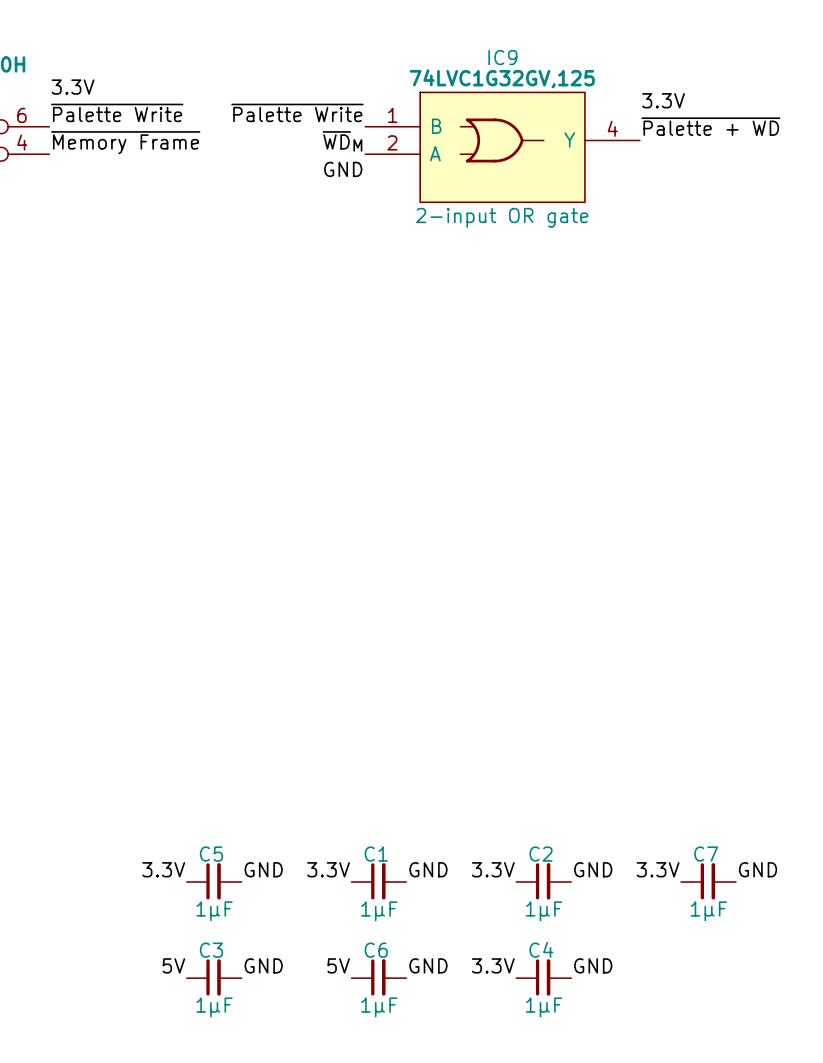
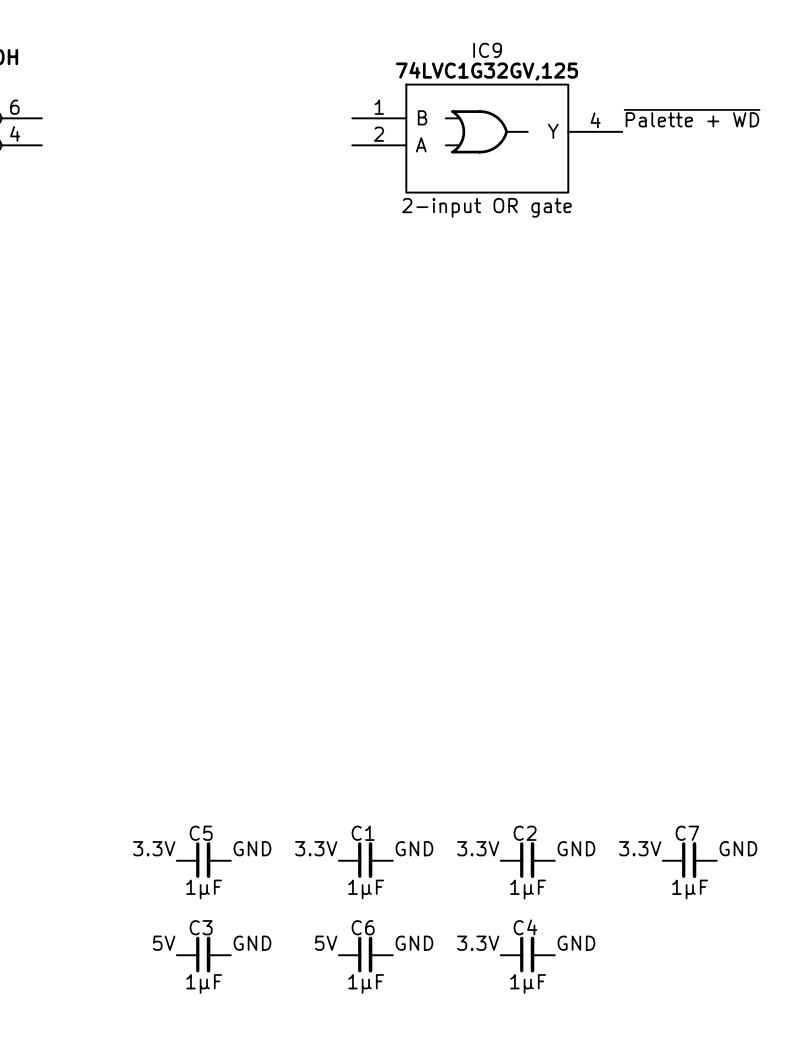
label: 3.3V (73, 87) -> none
label: 3.3V (663, 100) -> none
label: ~{Palette Write} (117, 112) -> none
label: ~{Palette Write} (297, 112) -> none
label: ~{WD}M (342, 141) -> none
label: ~{Memory Frame} (125, 142) -> none
label: GND (343, 169) -> none

